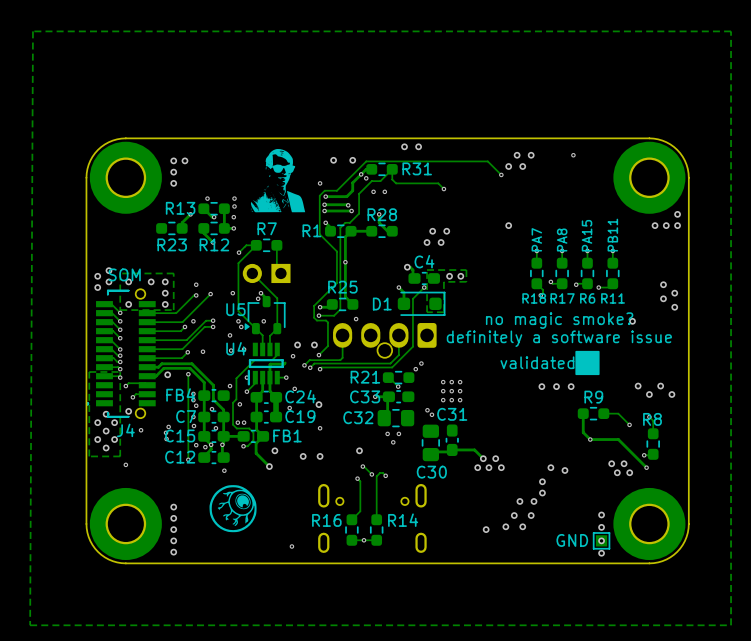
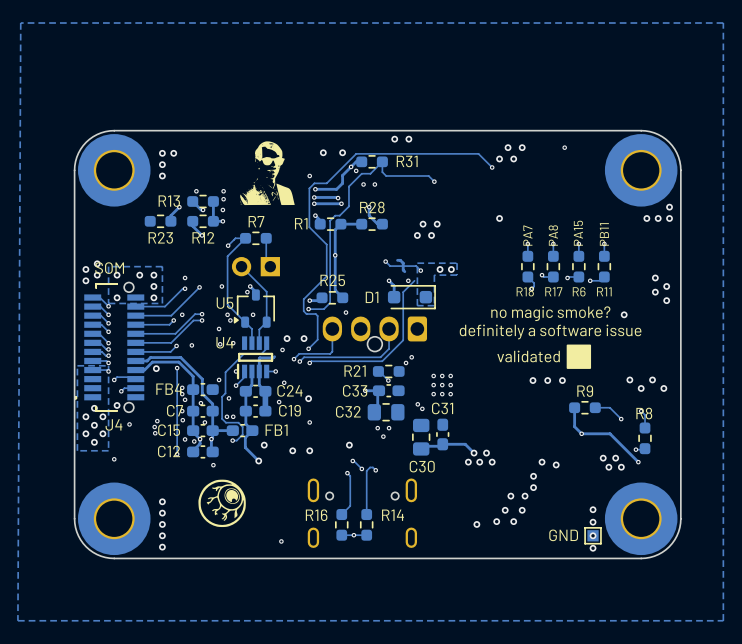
via: (407, 267) -> none
track: none -> (385, 261) (390, 266) (416, 266) (420, 270)
via: none -> (385, 261)
via: none -> (420, 270)
C4: (424, 278) -> none
via: none -> (408, 280)
via: (424, 287) -> none

